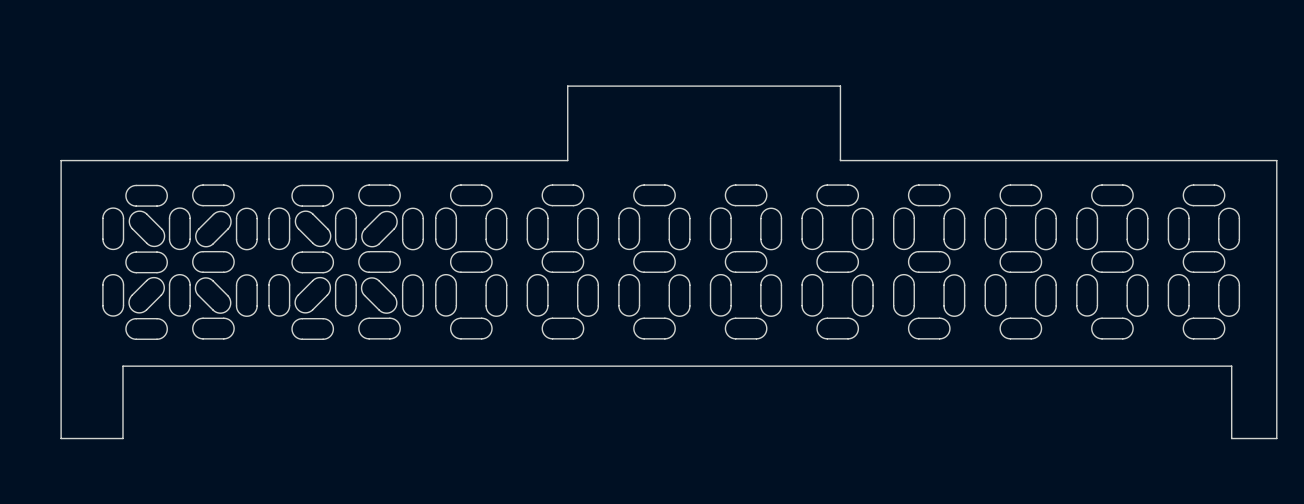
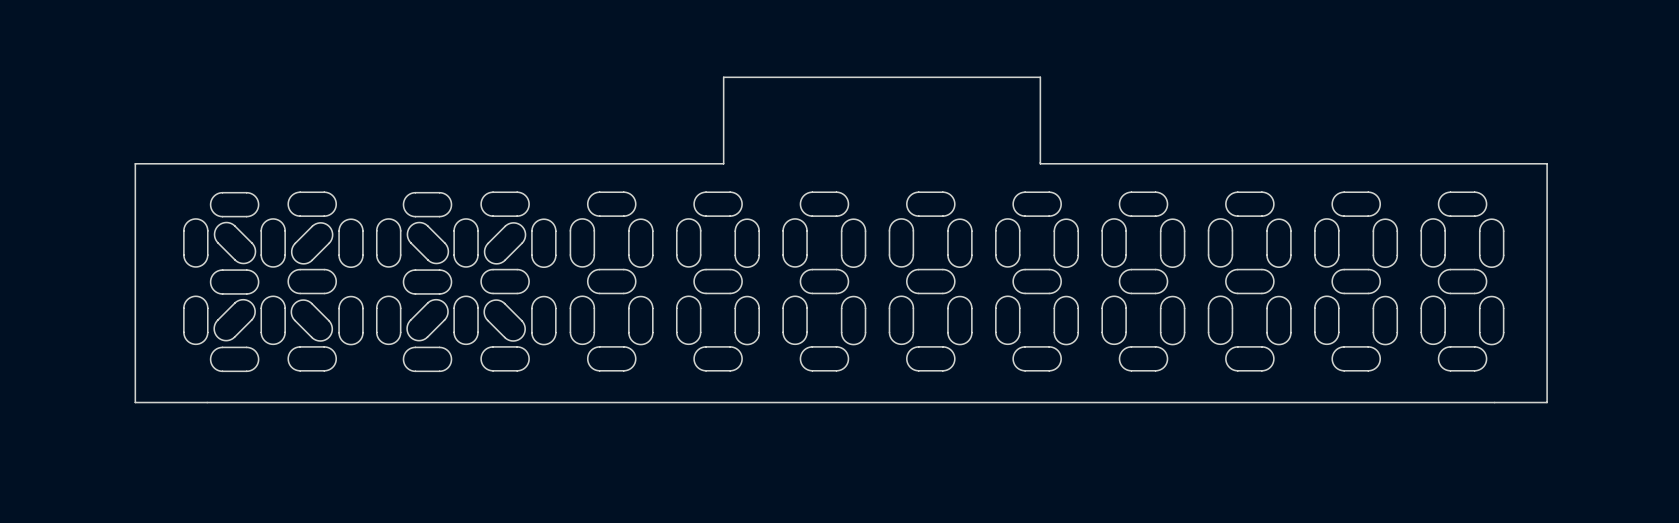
board edge: (61, 366) (61, 438) (122, 438) (122, 366) -> (135, 402) (207, 402)
board edge: (1231, 366) (1231, 438) (1276, 438) (1276, 366) -> (1494, 402) (1547, 402)

